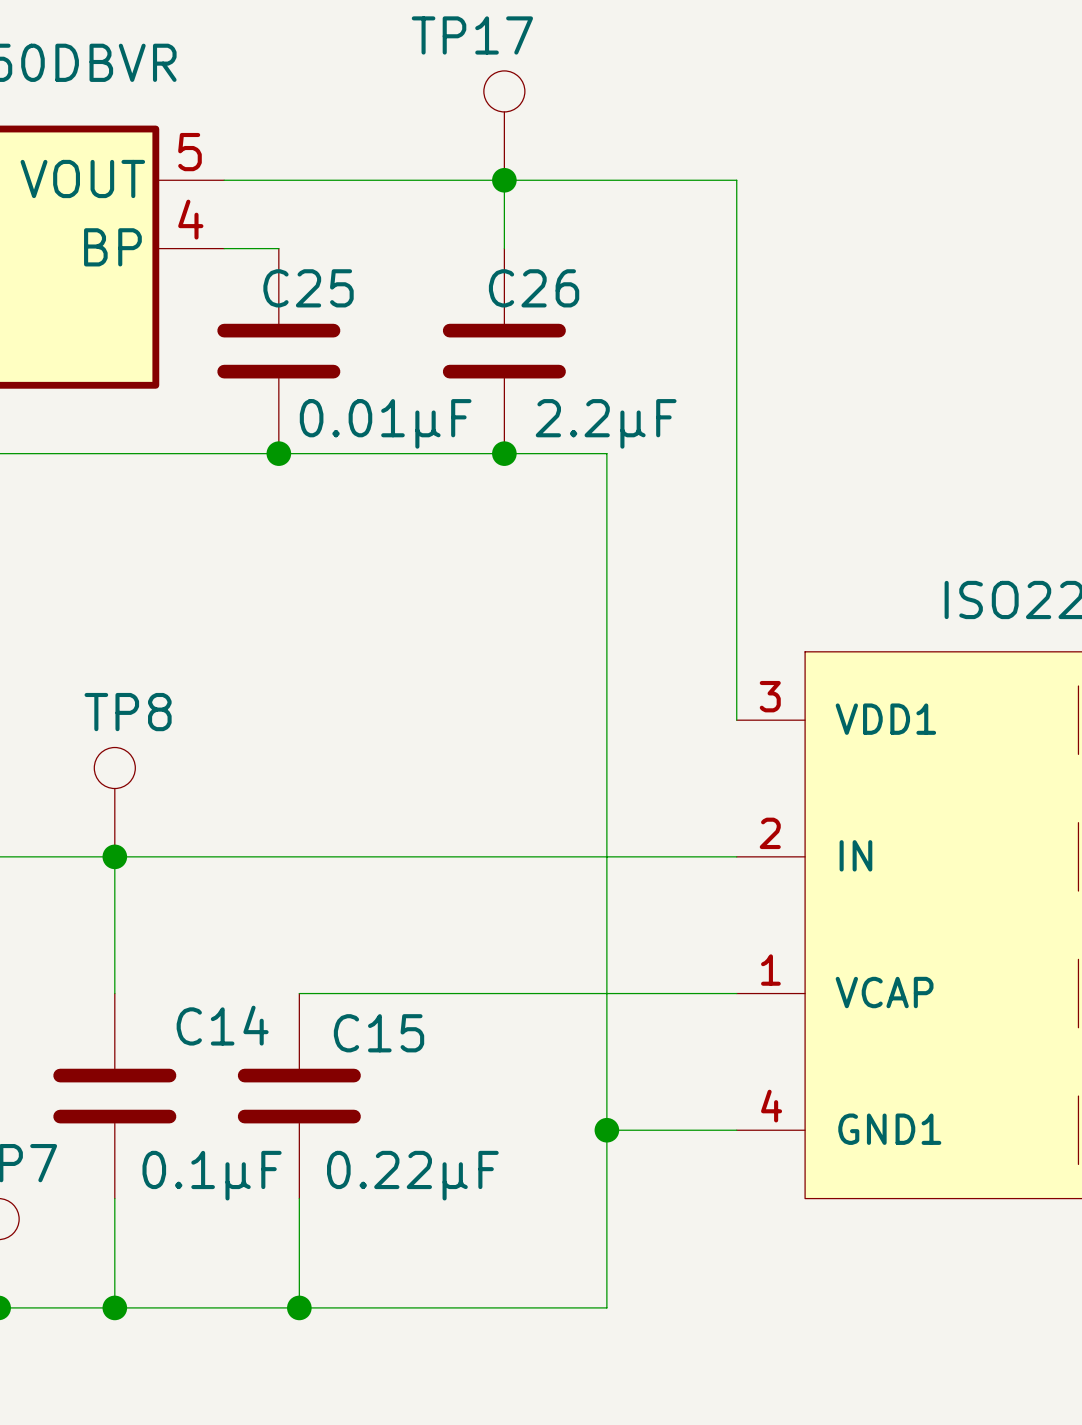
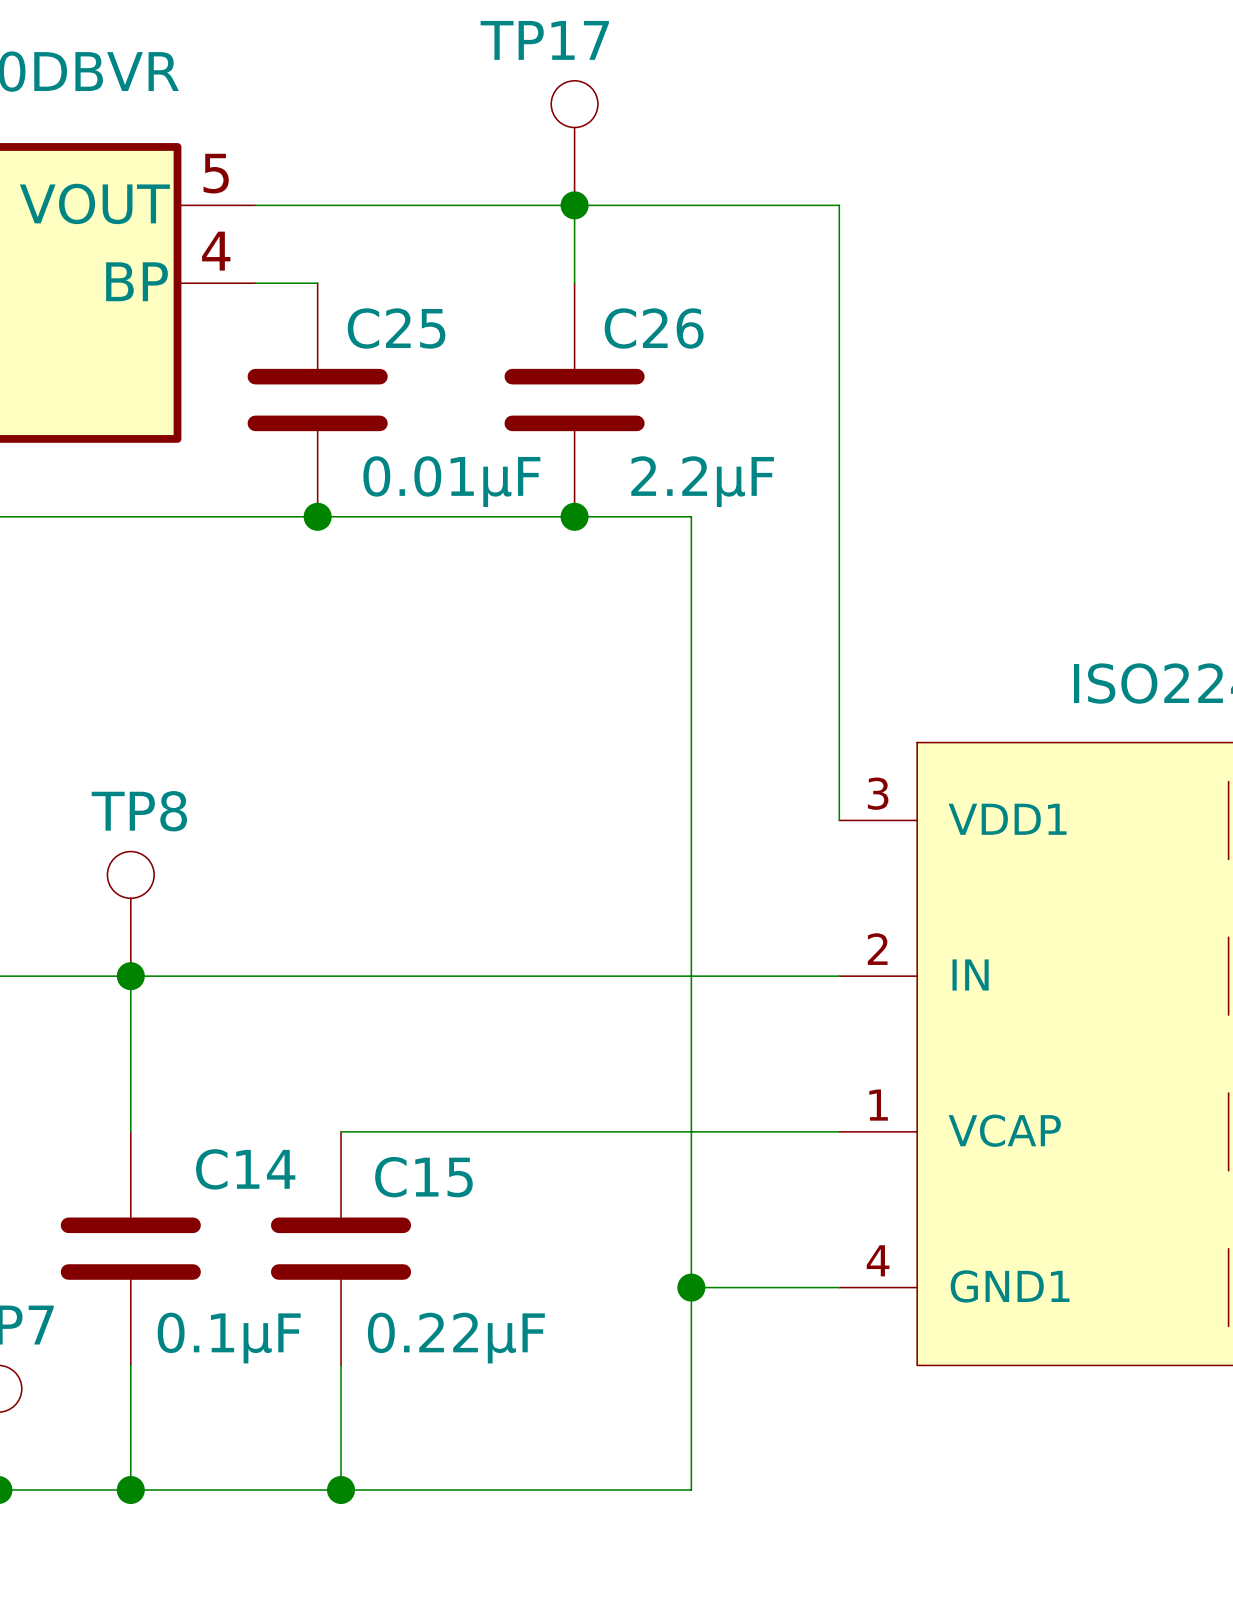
C25 name position: C25 (308, 288) -> C25 (396, 328)
C26 name position: C26 (534, 288) -> C26 (654, 328)

